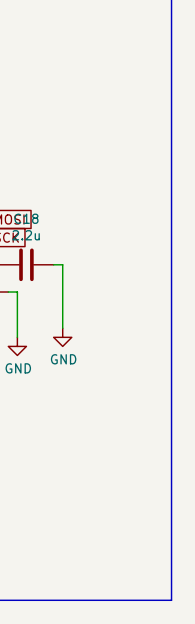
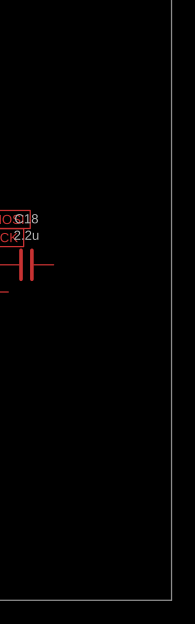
wire: (53, 264) (62, 264) (62, 328) -> none
wire: (8, 292) (17, 292) (17, 337) -> none
power symbol: GND (62, 337) -> none
power symbol: GND (17, 346) -> none

